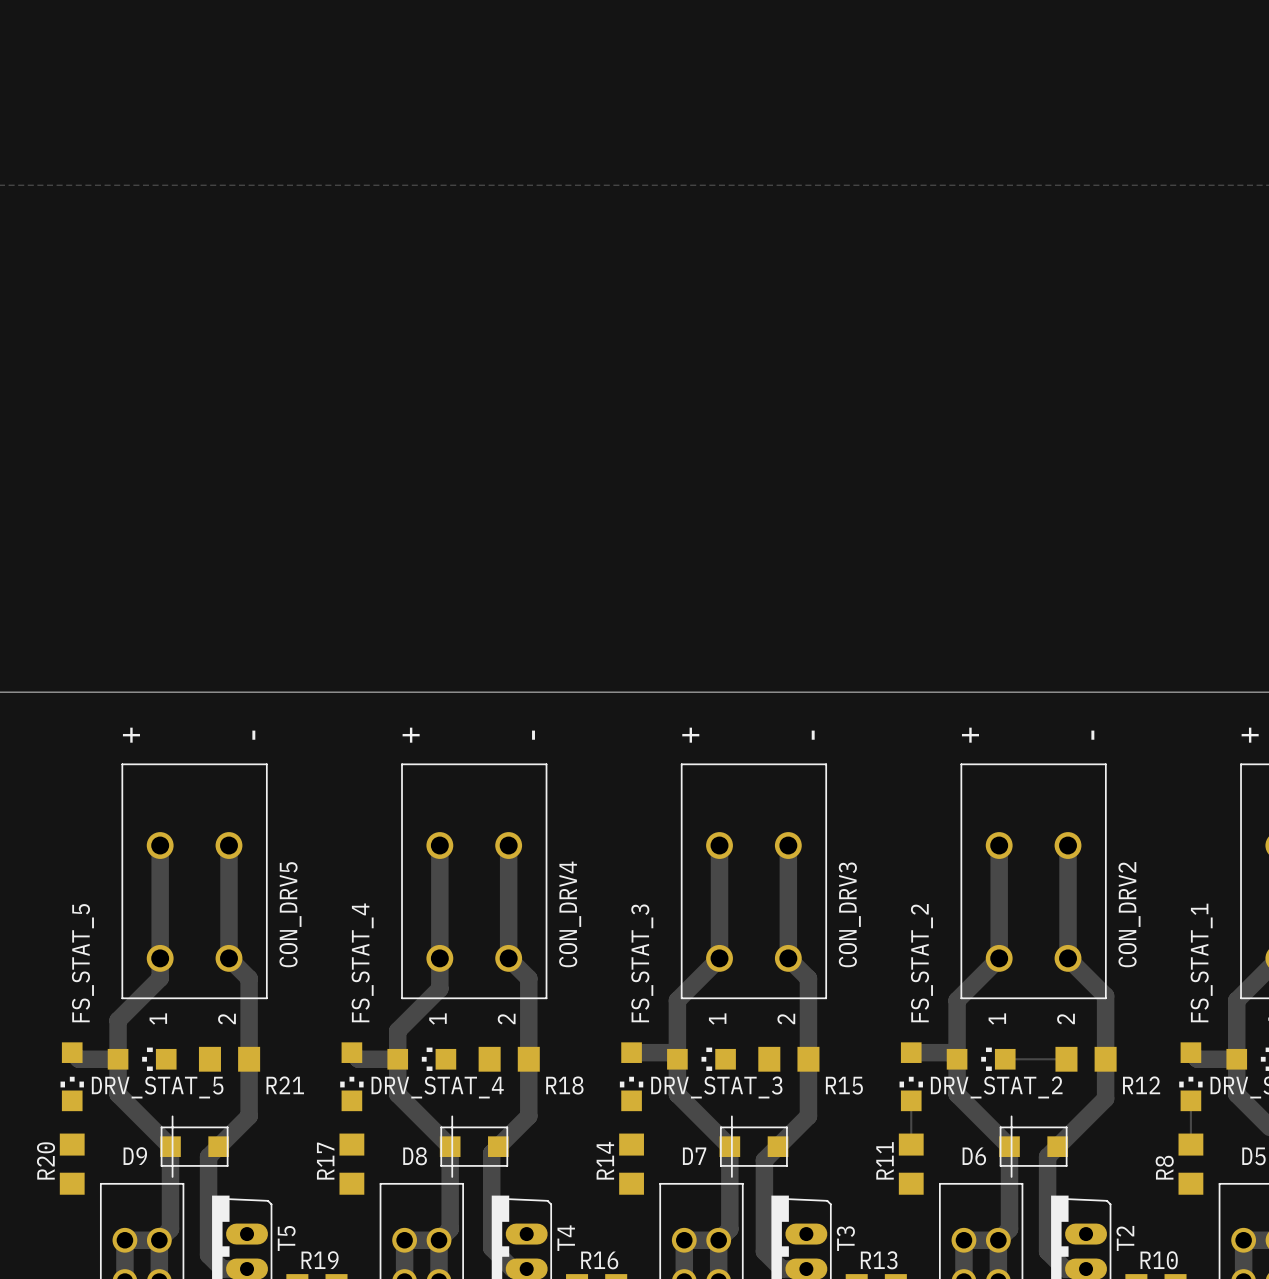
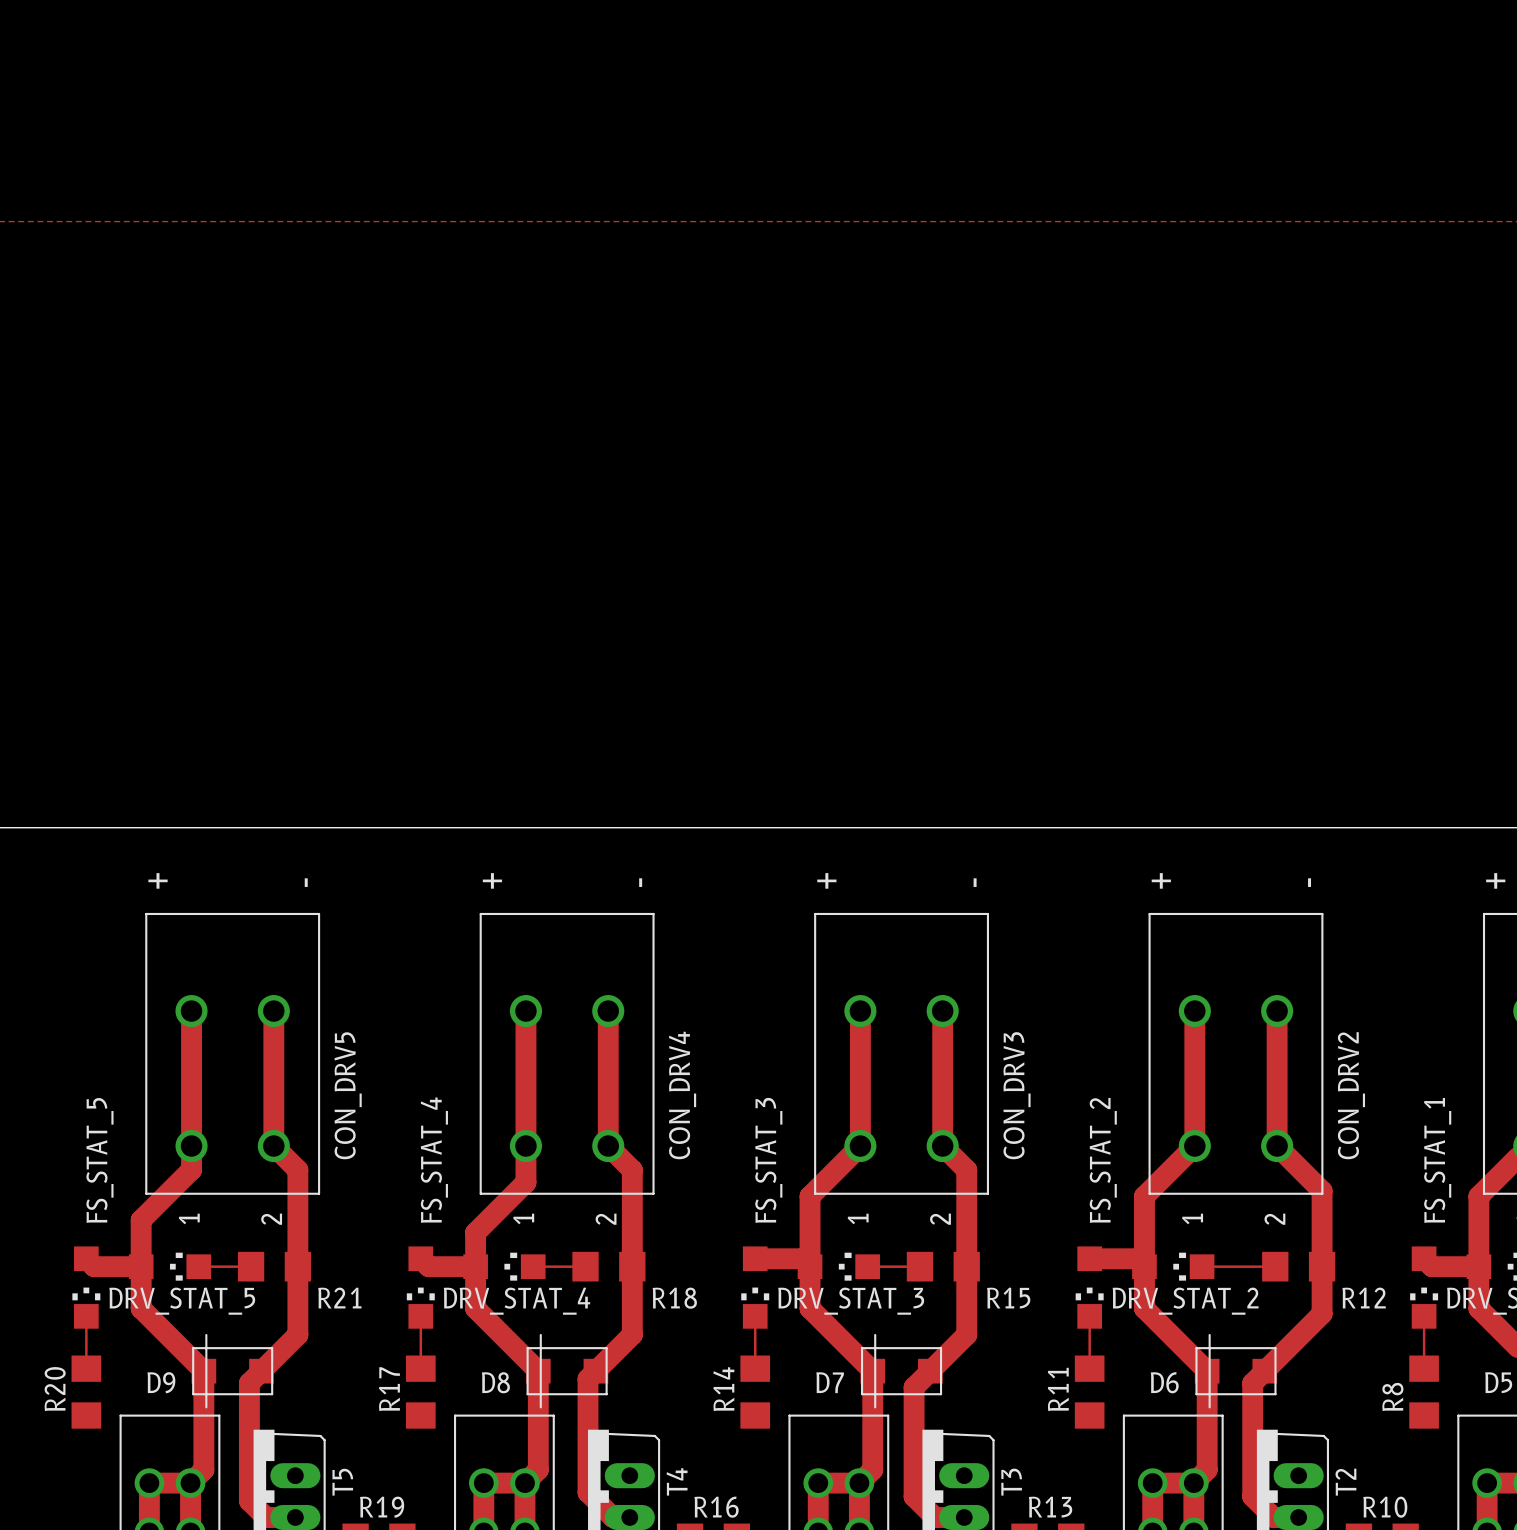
track: none -> (198, 1266) (251, 1266)
track: none -> (533, 1266) (585, 1266)
track: none -> (867, 1266) (919, 1266)
track: none -> (86, 1316) (86, 1368)
track: none -> (420, 1316) (420, 1368)
track: none -> (755, 1316) (755, 1368)

